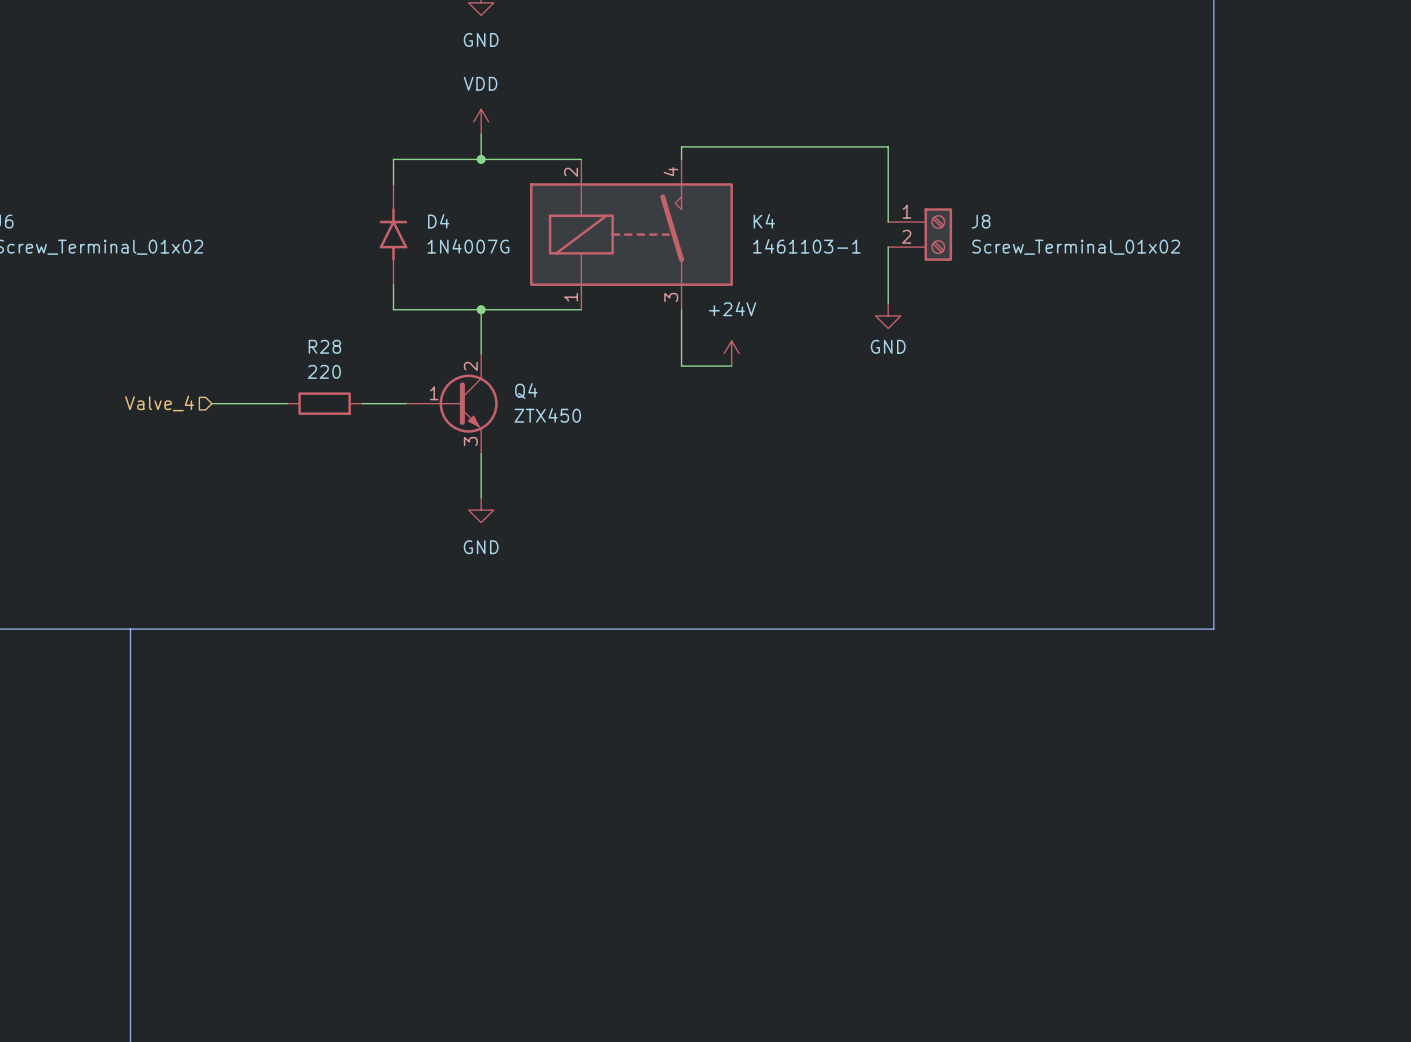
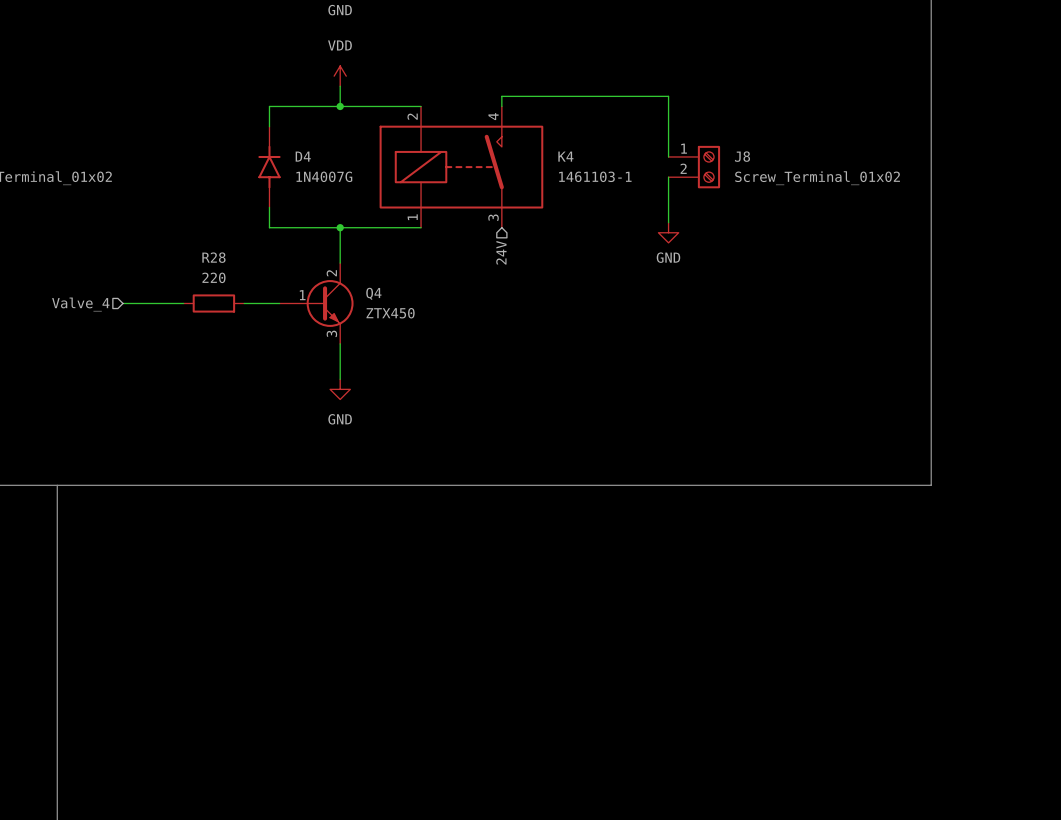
wire: (681, 309) (681, 366) (731, 366) -> none
hierarchical label: none -> 24V (501, 252)
power symbol: +24V (731, 353) -> none

